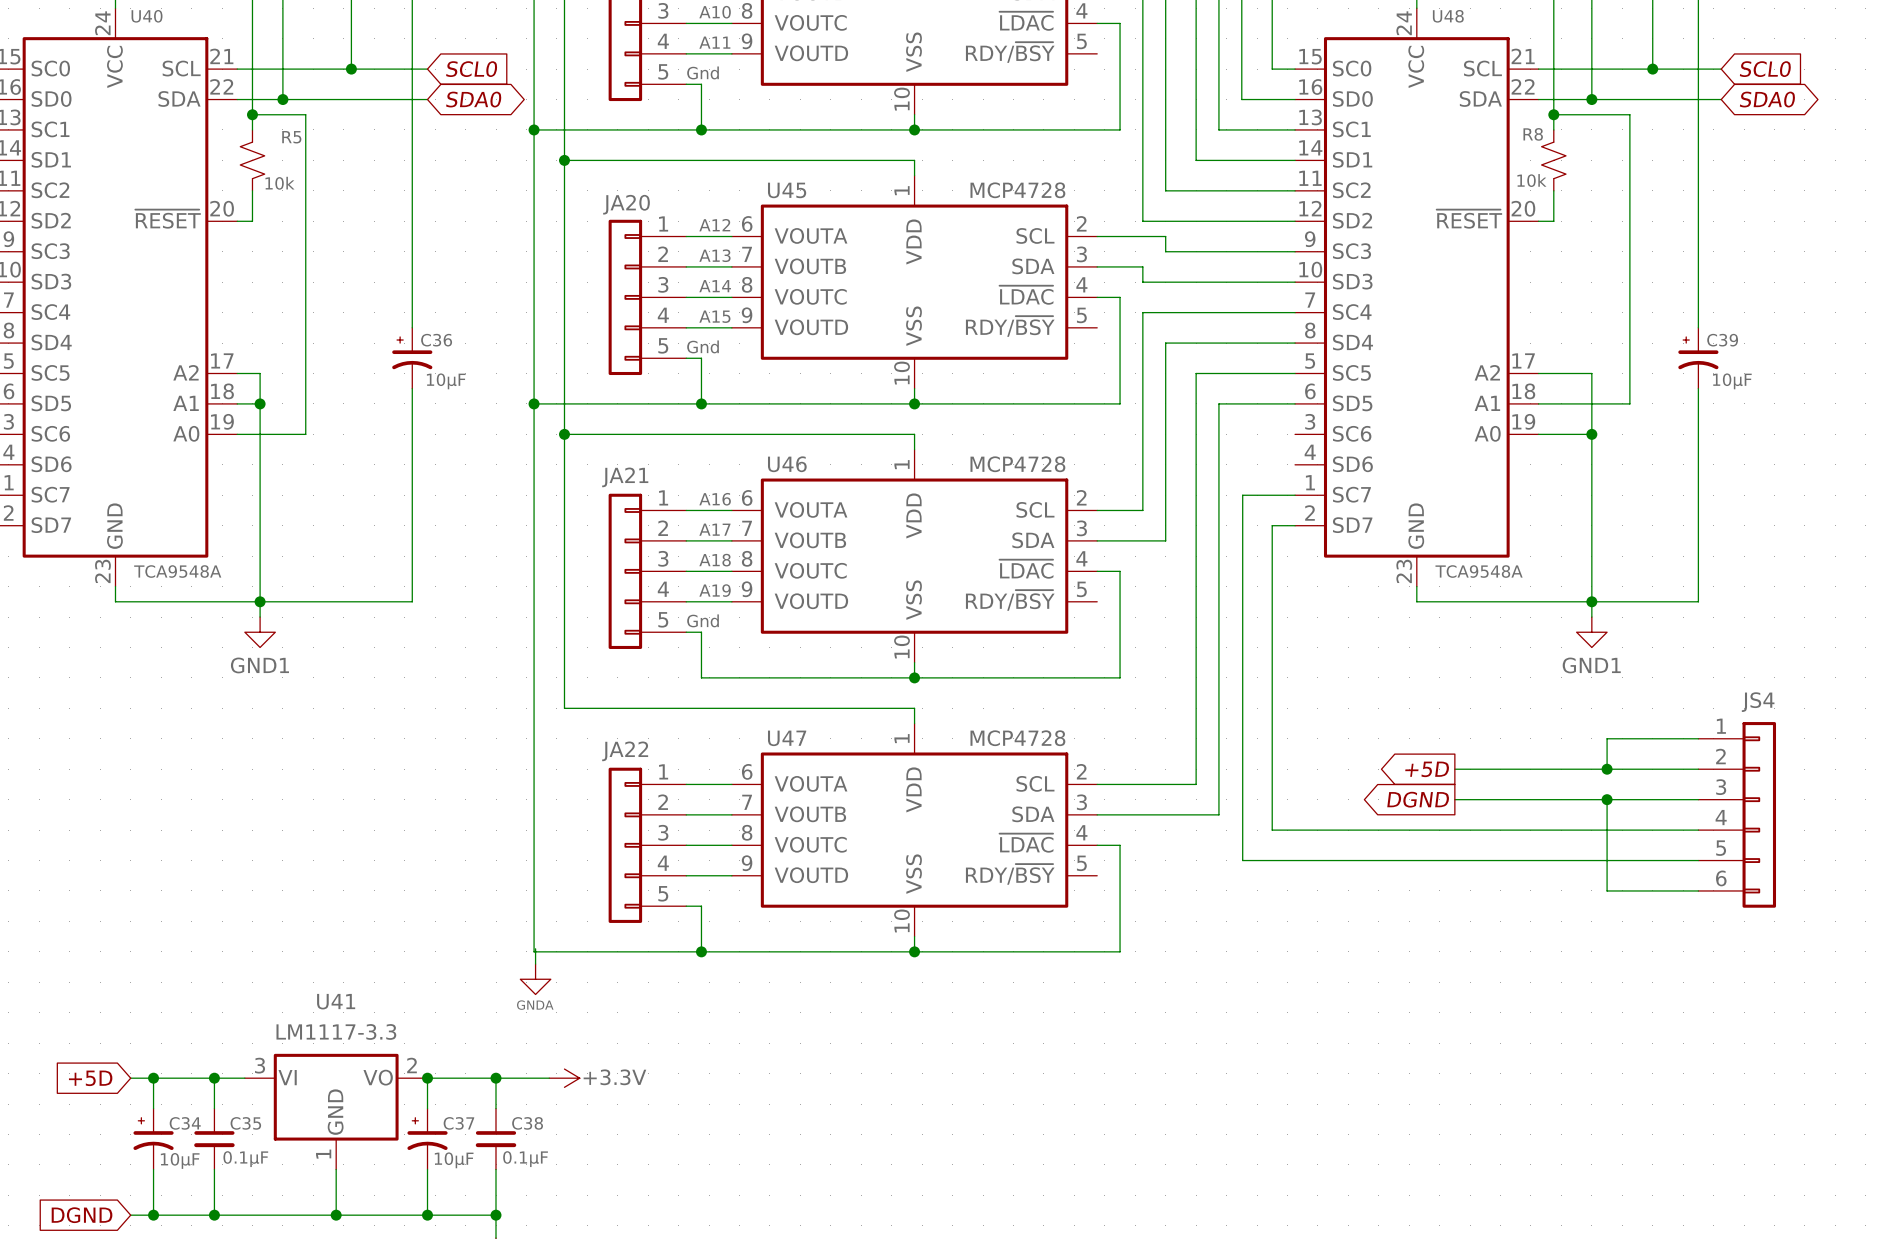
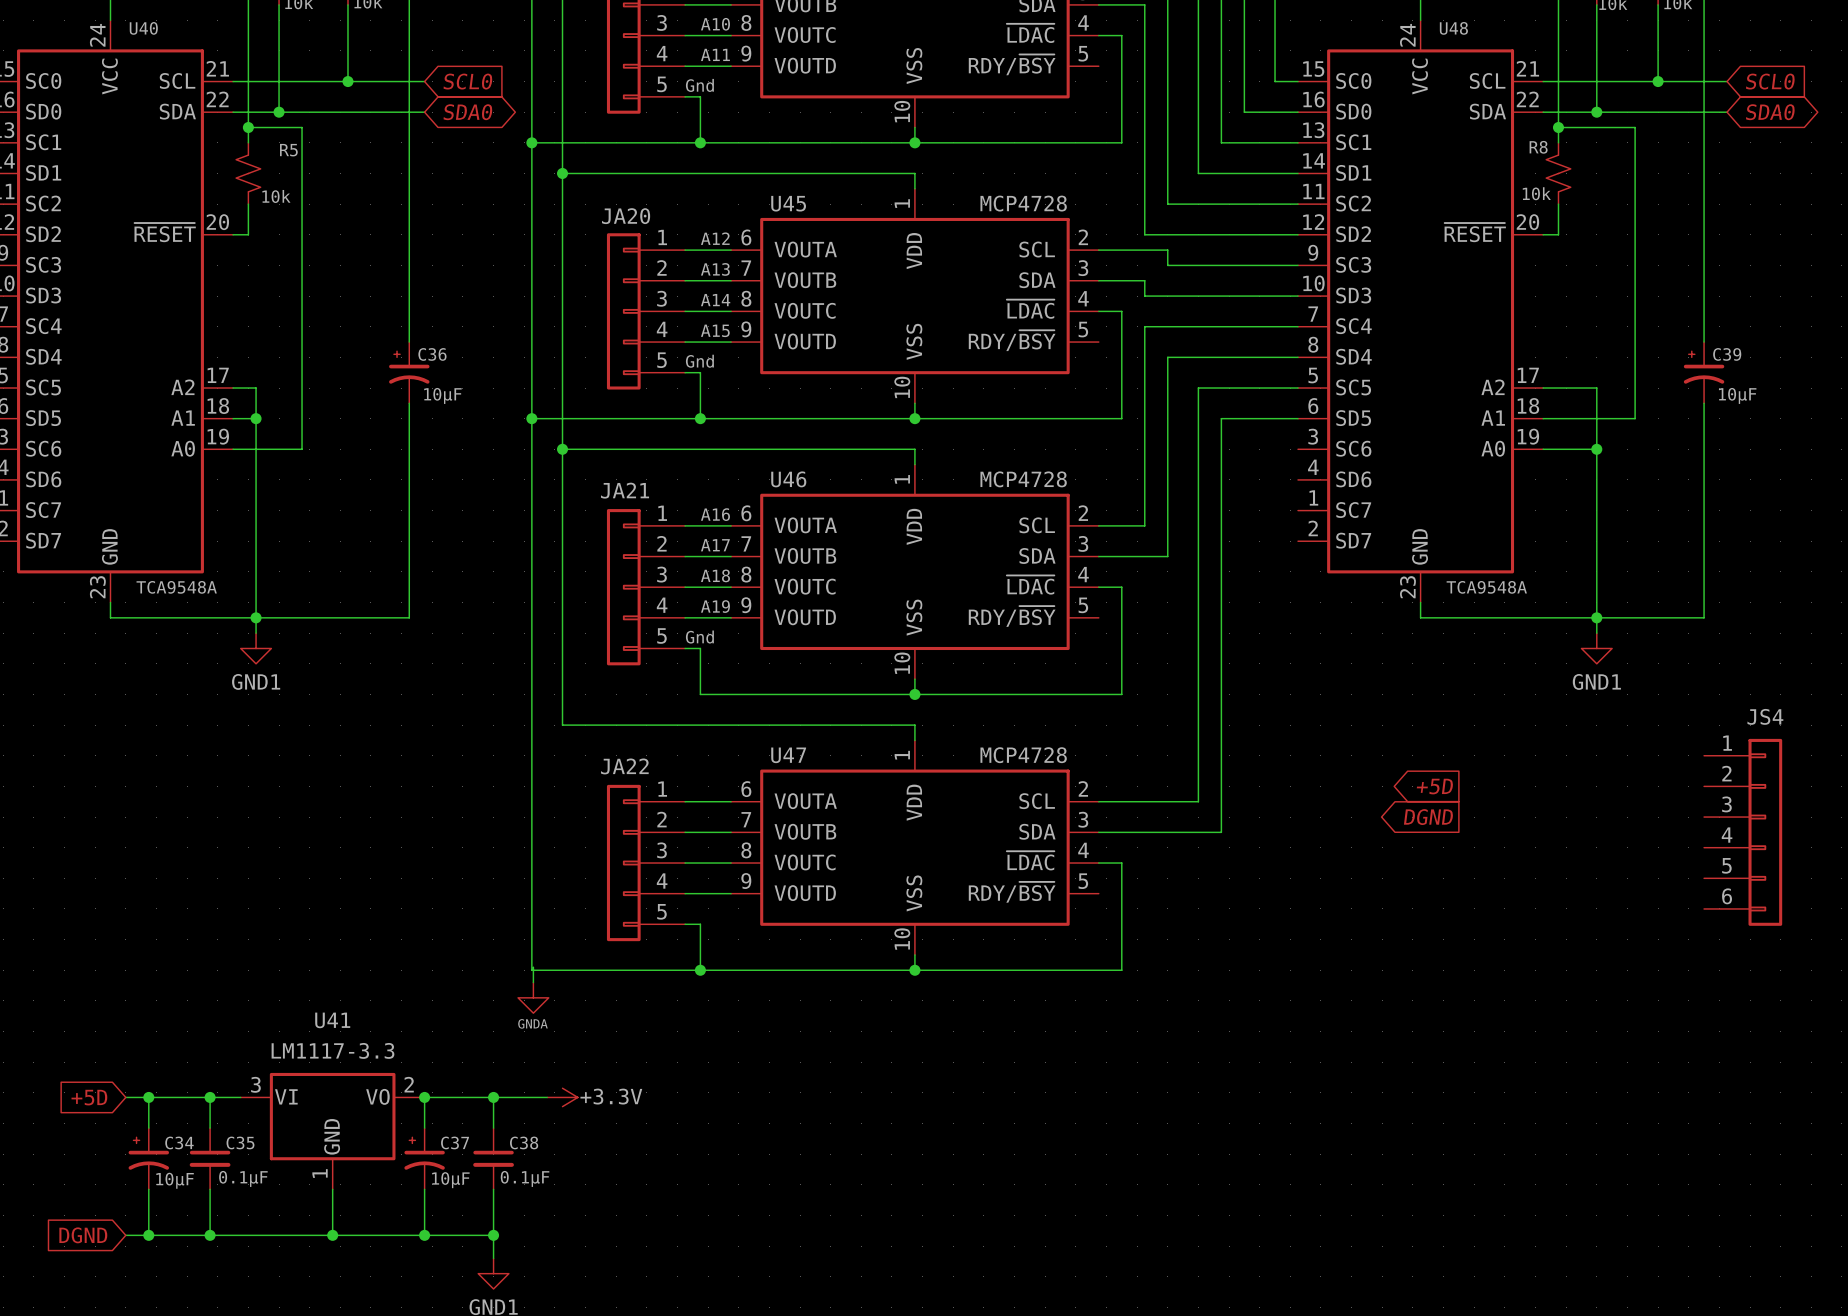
wire: (1295, 495) (1242, 495) (1242, 860) (1698, 860) -> none
wire: (1295, 525) (1272, 525) (1272, 830) (1698, 830) -> none
wire: (1698, 738) (1607, 738) (1607, 769) -> none
wire: (1454, 769) (1698, 769) -> none
junction: (1607, 769) -> none
wire: (1454, 799) (1698, 799) -> none
wire: (1607, 799) (1607, 890) (1698, 890) -> none
junction: (1607, 799) -> none

